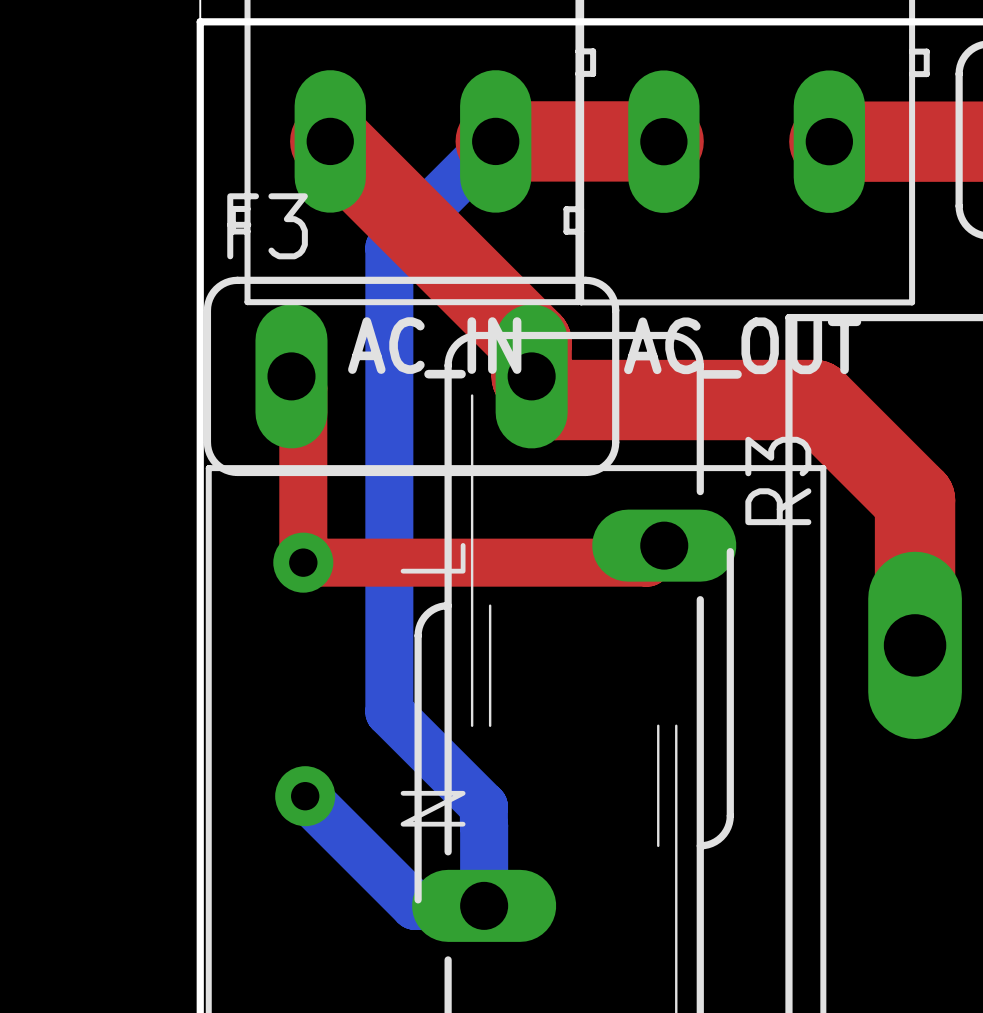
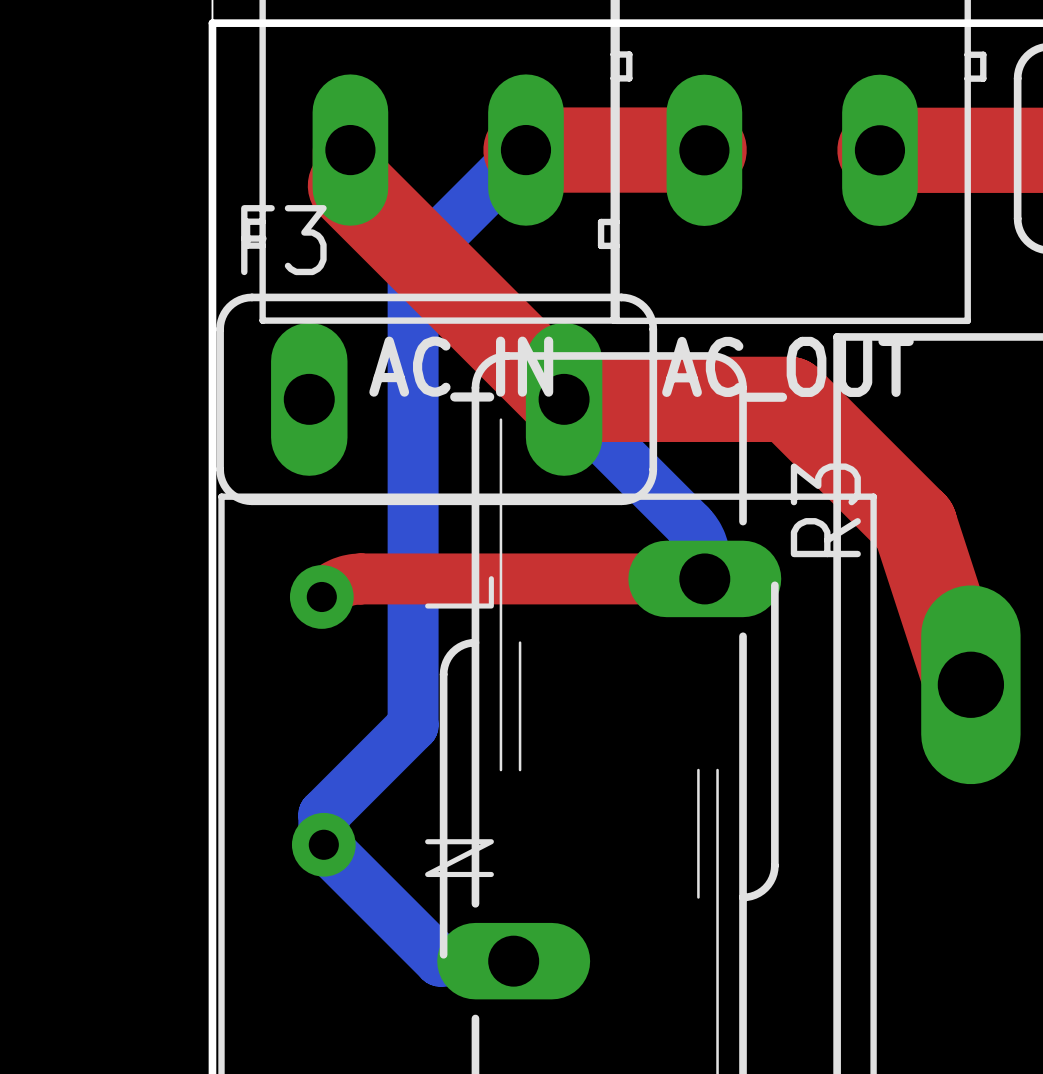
top track: (330, 141) (531, 342) (531, 376) (555, 400) (814, 400) (915, 500) (915, 645) -> (350, 150) (350, 185) (564, 399) (789, 399) (914, 524) (964, 678)
bottom track: none -> (564, 399) (694, 530) (703, 547) (704, 578)
top track: (292, 377) (303, 388) (303, 562) (647, 562) (664, 545) -> (325, 593) (341, 582) (360, 578) (704, 578)
bottom track: (389, 683) (389, 712) (483, 806) (484, 905) -> (413, 725) (323, 814) (323, 844)

